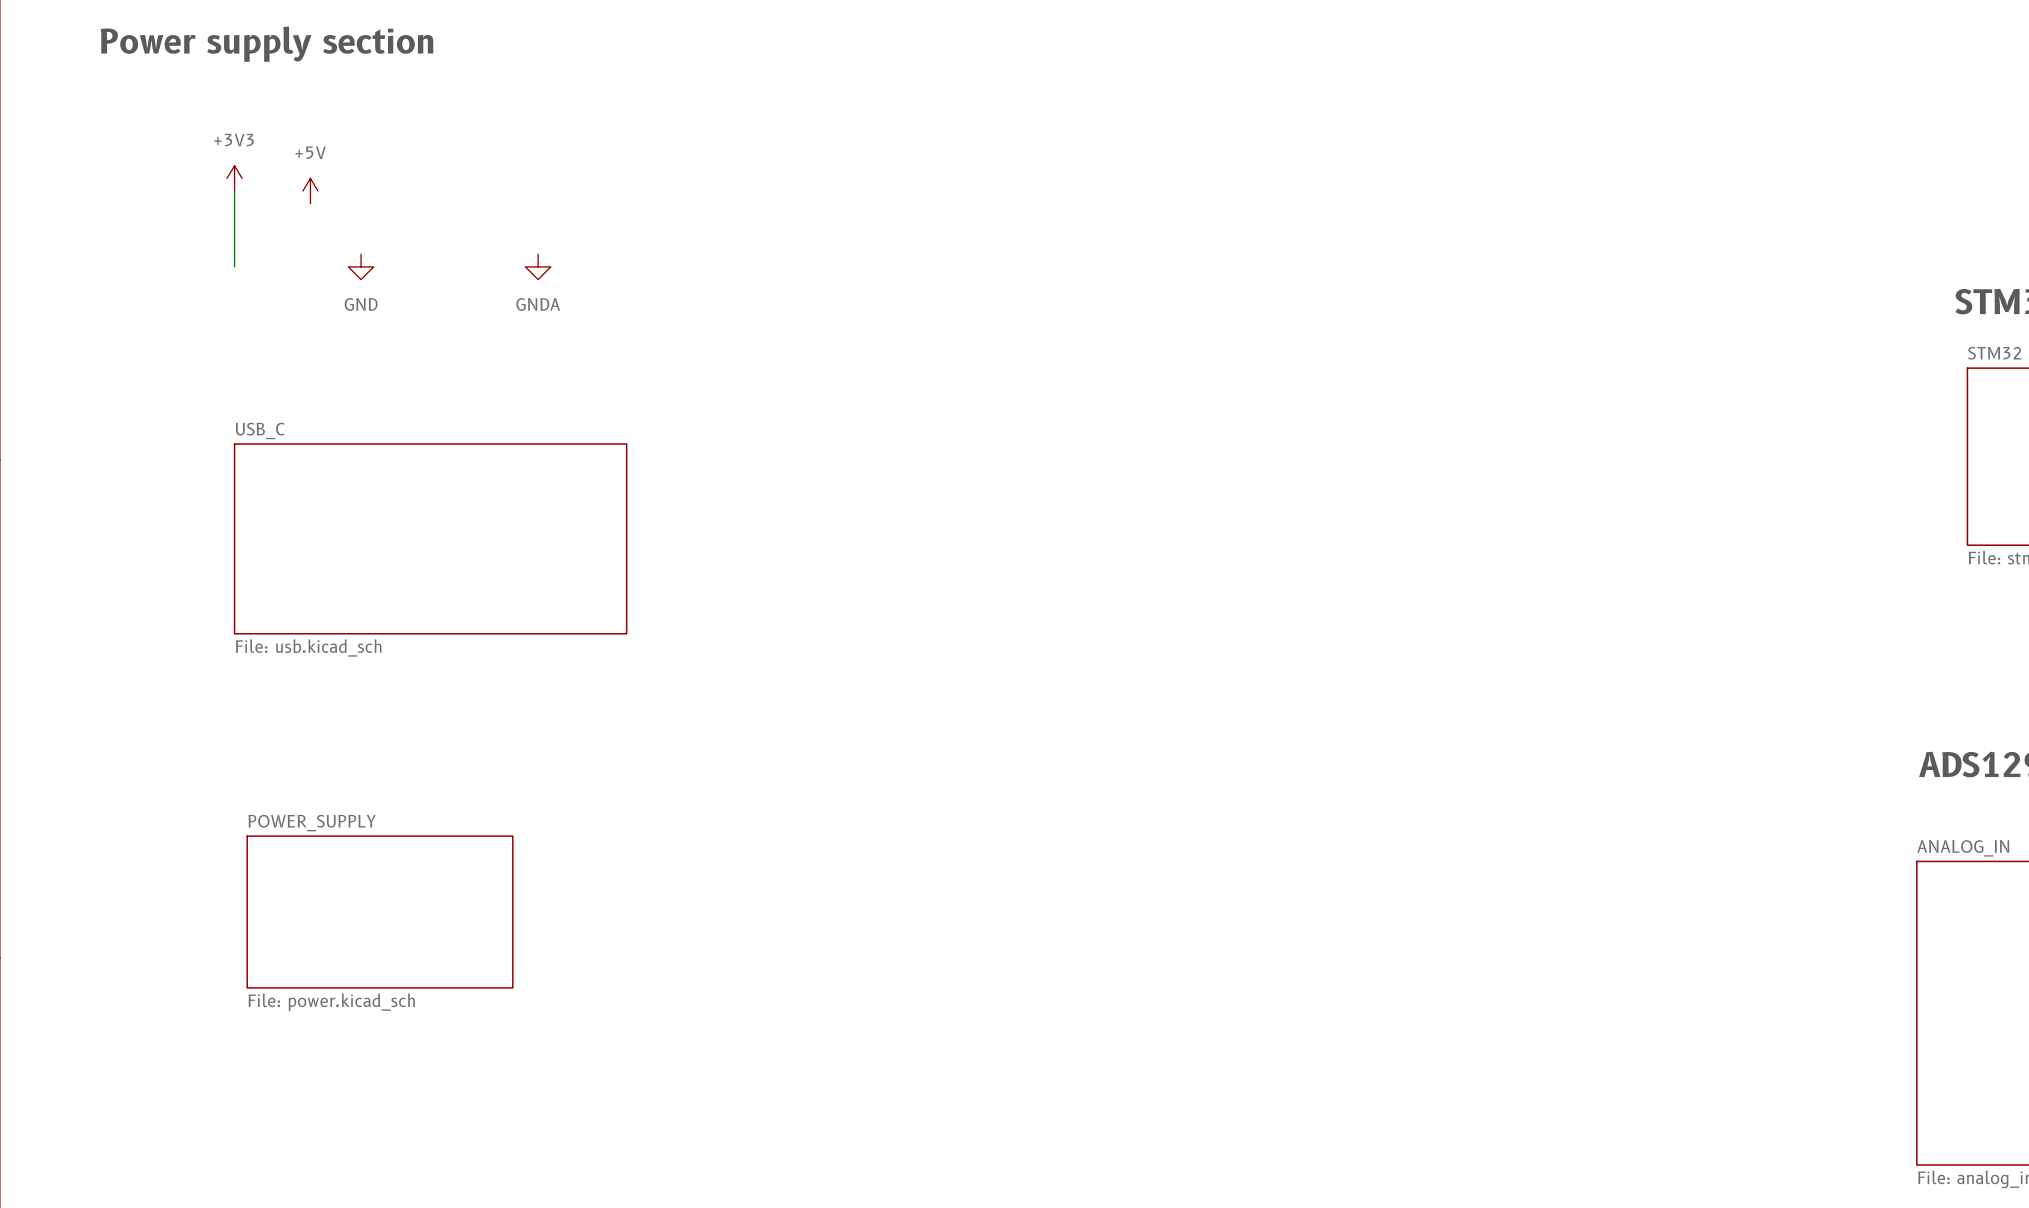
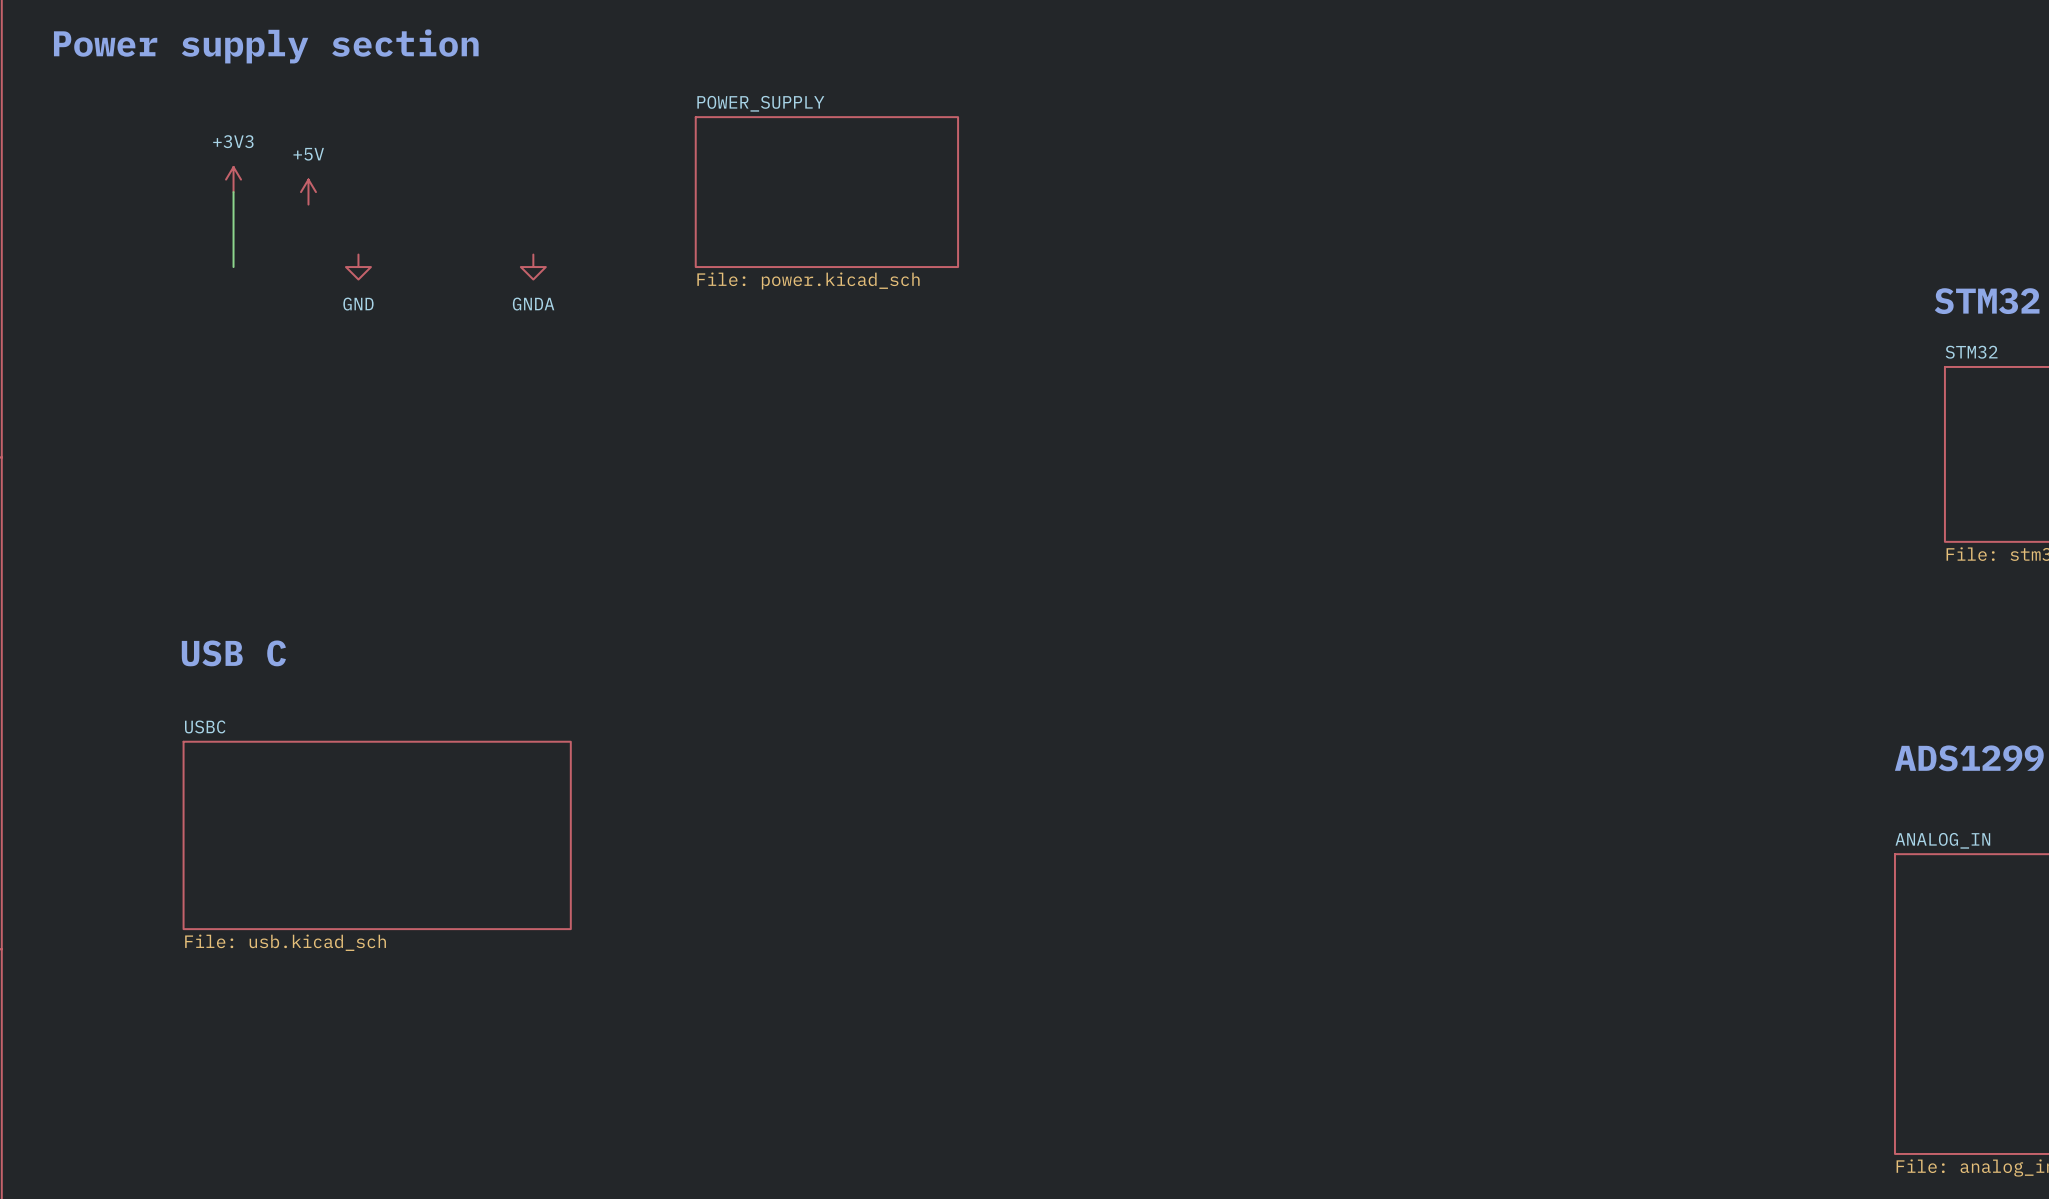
sheet POWER_SUPPLY: none -> File: power.kicad_sch (826, 192)
sheet USB_C: File: usb.kicad_sch (430, 538) -> none
text: none -> USB C (233, 653)
sheet USBC: none -> File: usb.kicad_sch (377, 835)
sheet POWER_SUPPLY: File: power.kicad_sch (380, 912) -> none

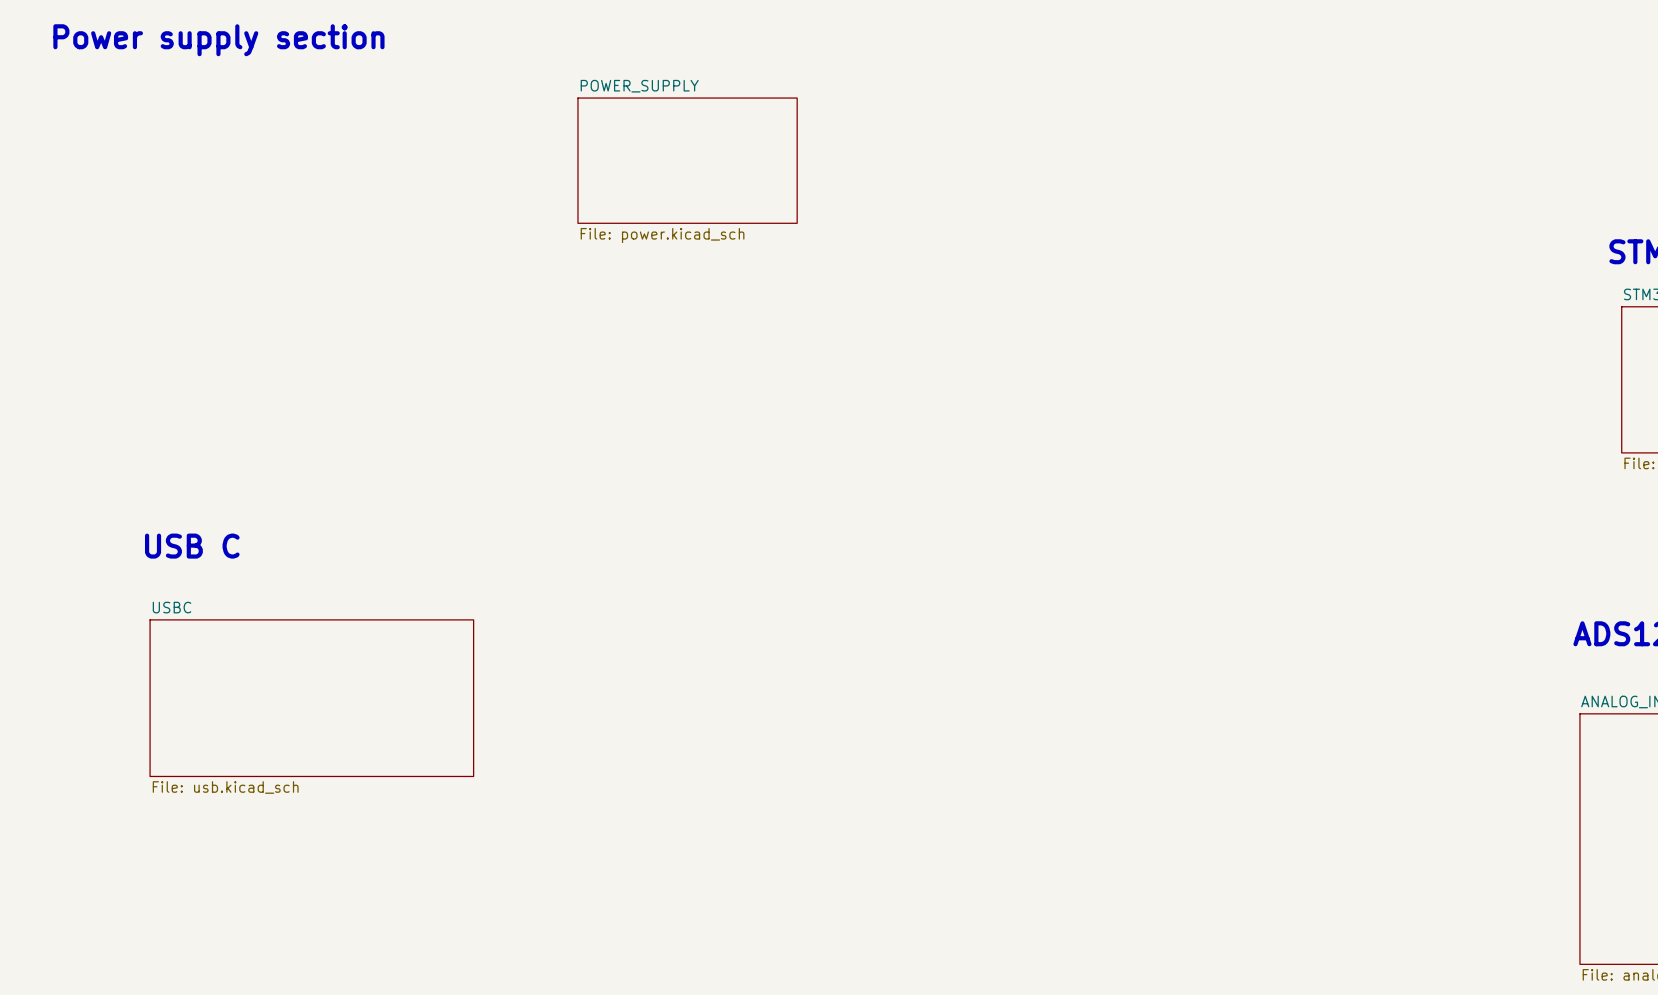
power symbol: +3V3 (233, 179) -> none
wire: (233, 192) (233, 267) -> none
power symbol: +5V (308, 192) -> none
power symbol: GND (358, 267) -> none
power symbol: GNDA (533, 267) -> none

